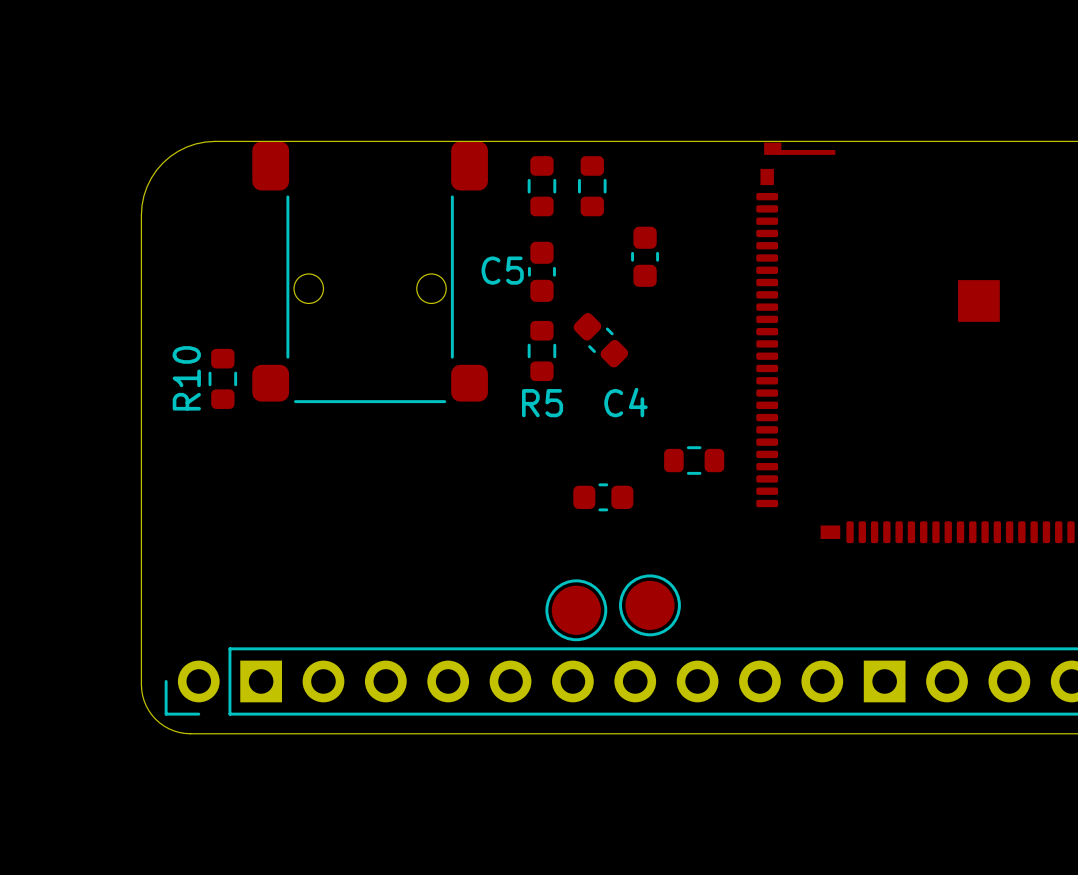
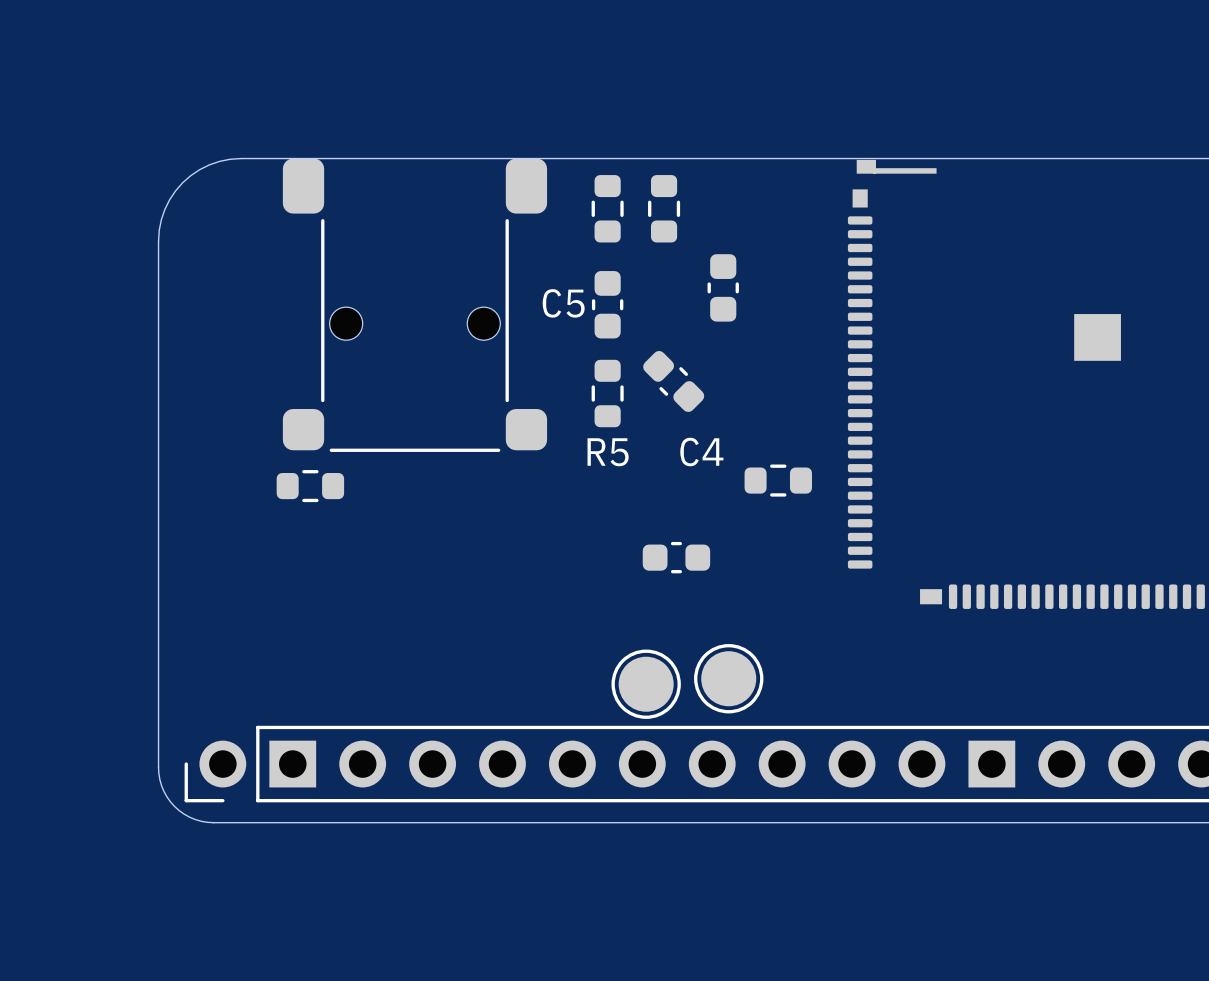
R10: (222, 378) -> none
part: none -> (310, 486)
part position: (694, 460) -> (778, 480)

